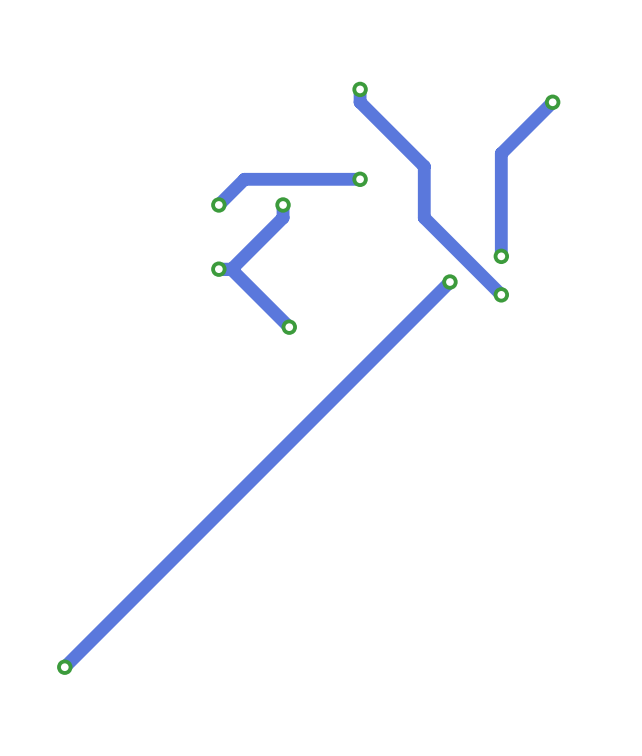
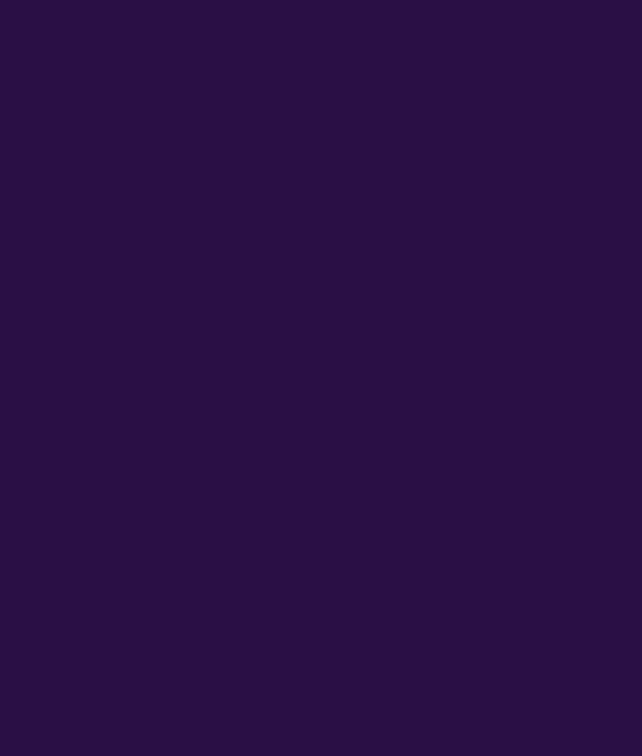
track: (360, 89) (360, 102) (424, 166) (424, 217) (501, 294) -> none
via: (360, 89) -> none
track: (552, 102) (501, 153) (501, 256) -> none
via: (552, 102) -> none
track: (360, 179) (244, 179) (218, 204) -> none
via: (360, 179) -> none
via: (218, 204) -> none
track: (283, 204) (283, 217) (231, 269) (218, 269) (231, 269) (289, 327) -> none
via: (283, 204) -> none
via: (501, 256) -> none
via: (218, 269) -> none
track: (449, 282) (64, 667) -> none
via: (449, 282) -> none
via: (501, 294) -> none
via: (289, 327) -> none
via: (64, 667) -> none

